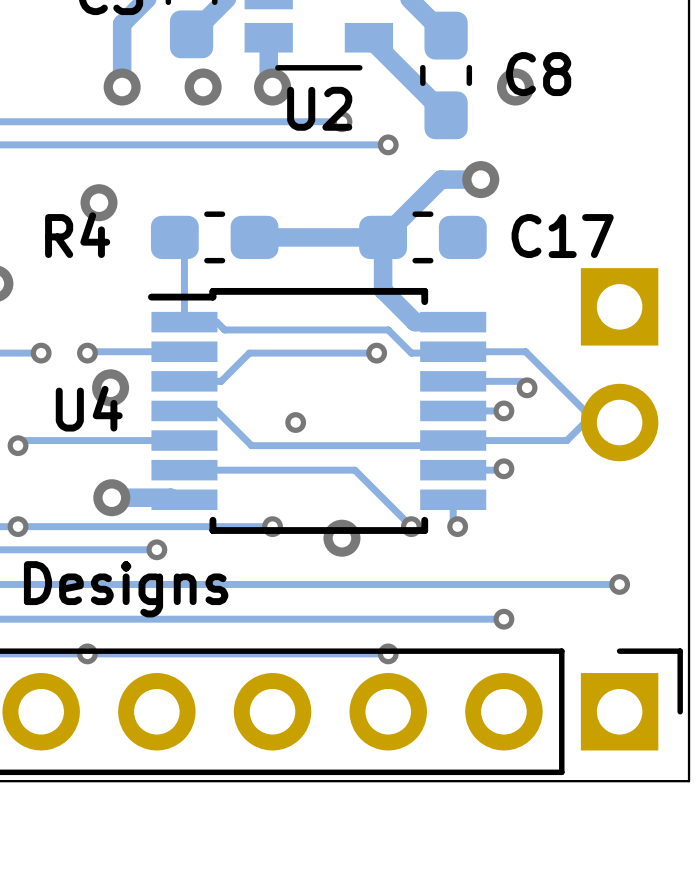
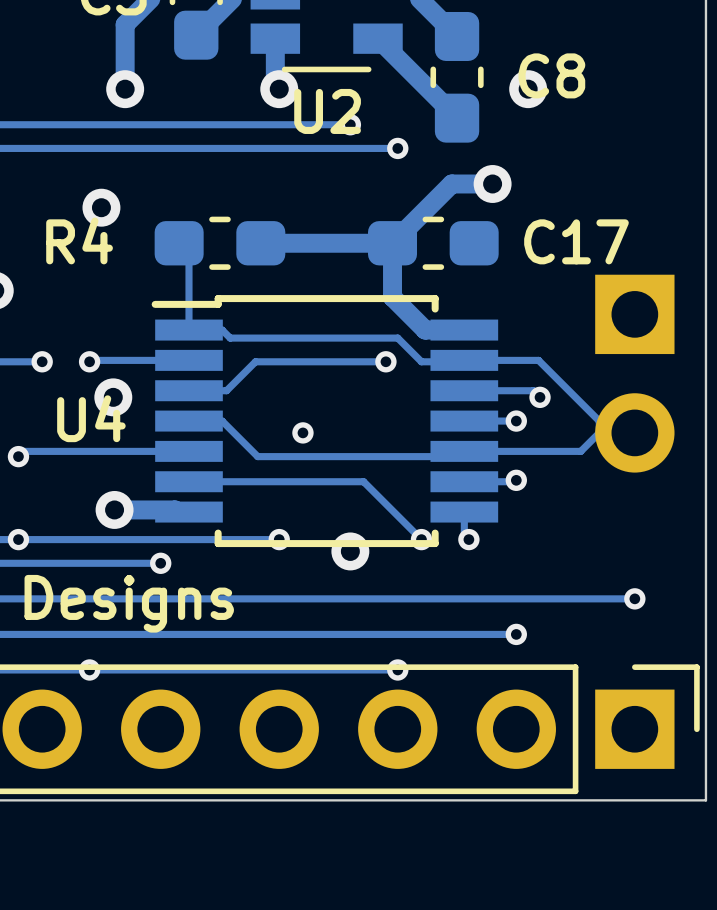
via: (203, 87) -> none

